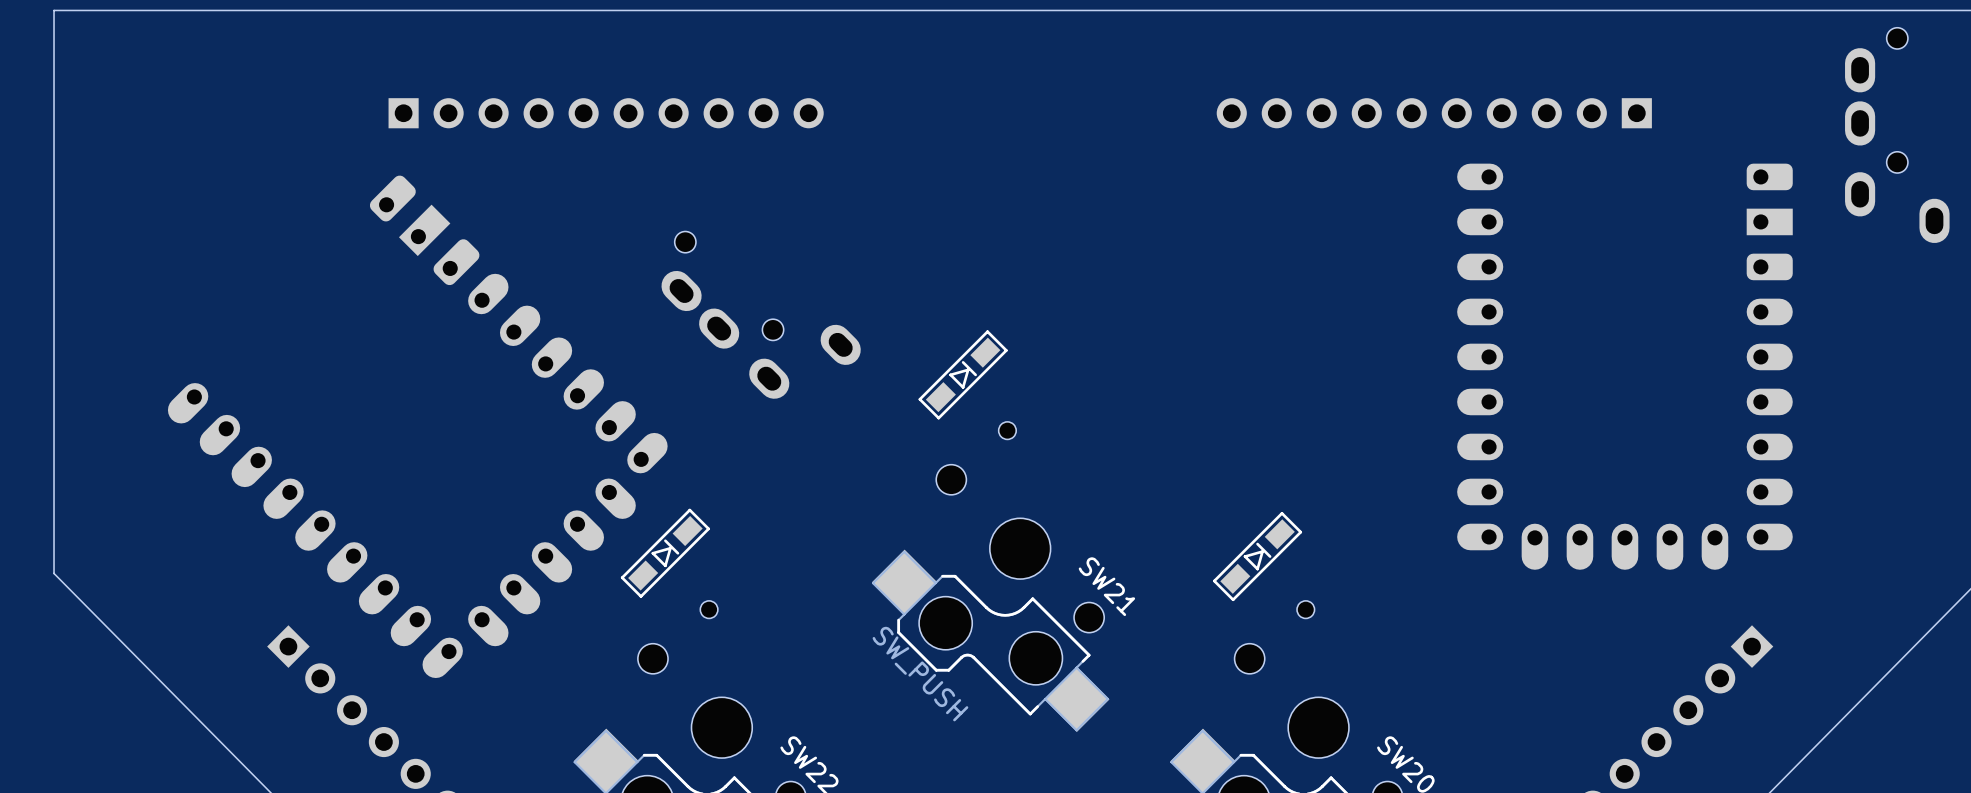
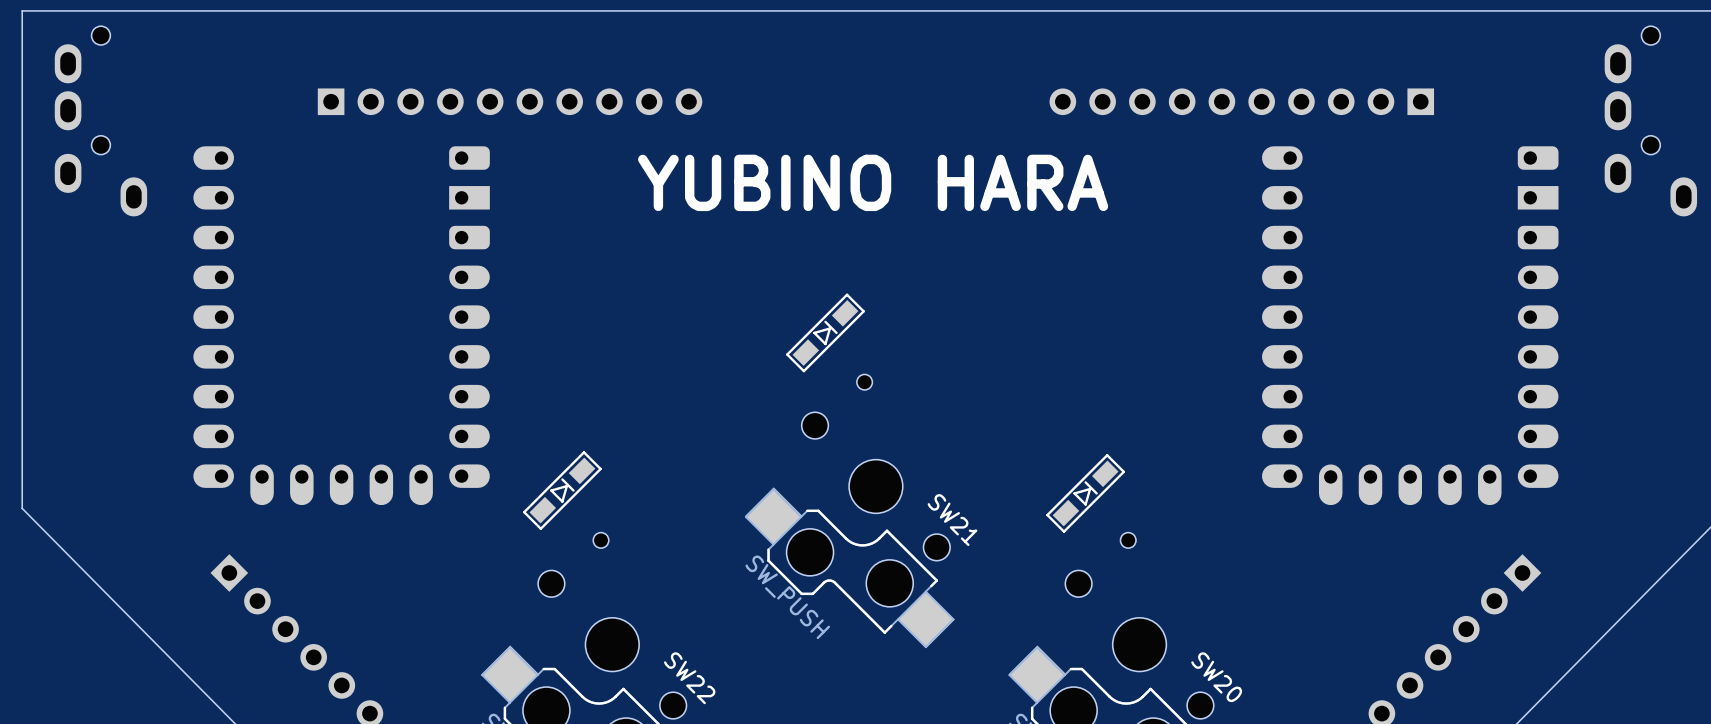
part: none -> (100, 121)
text: none -> YUBINO HARA (873, 182)
part: (761, 315) -> none
part: none -> (341, 325)
part: (417, 426) -> none

